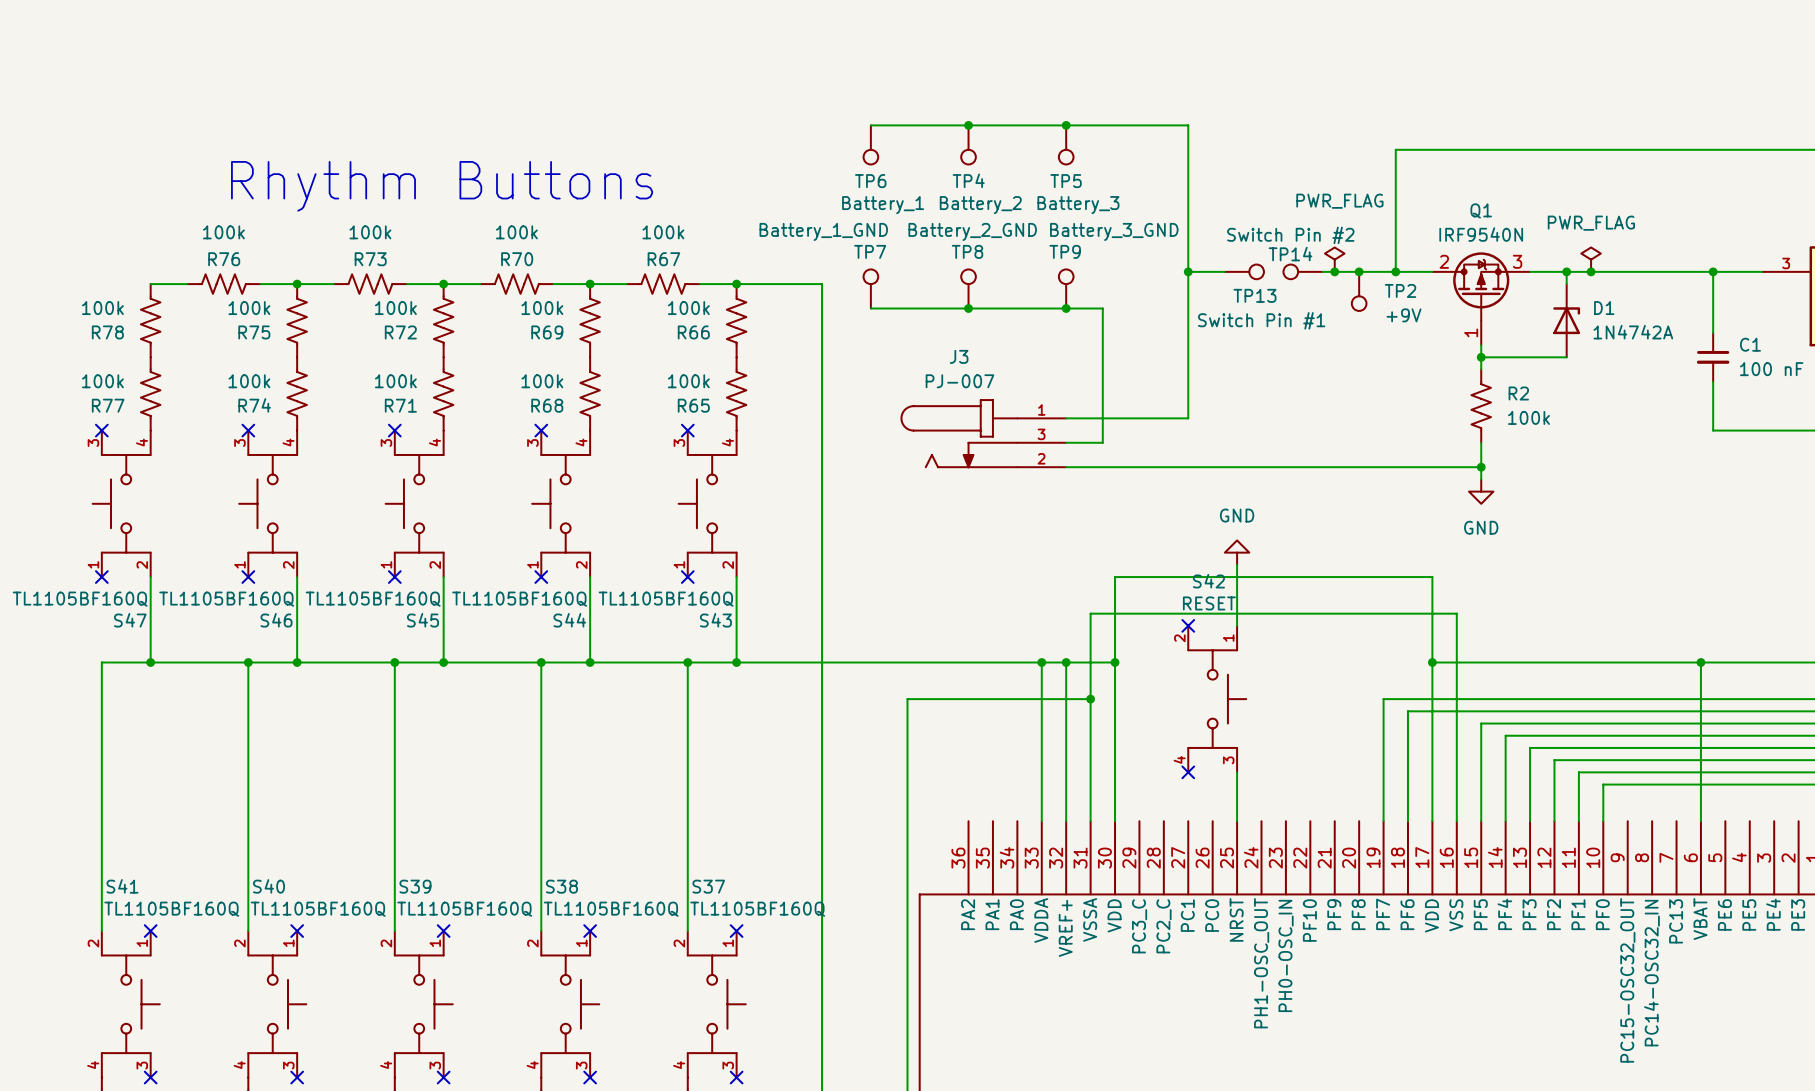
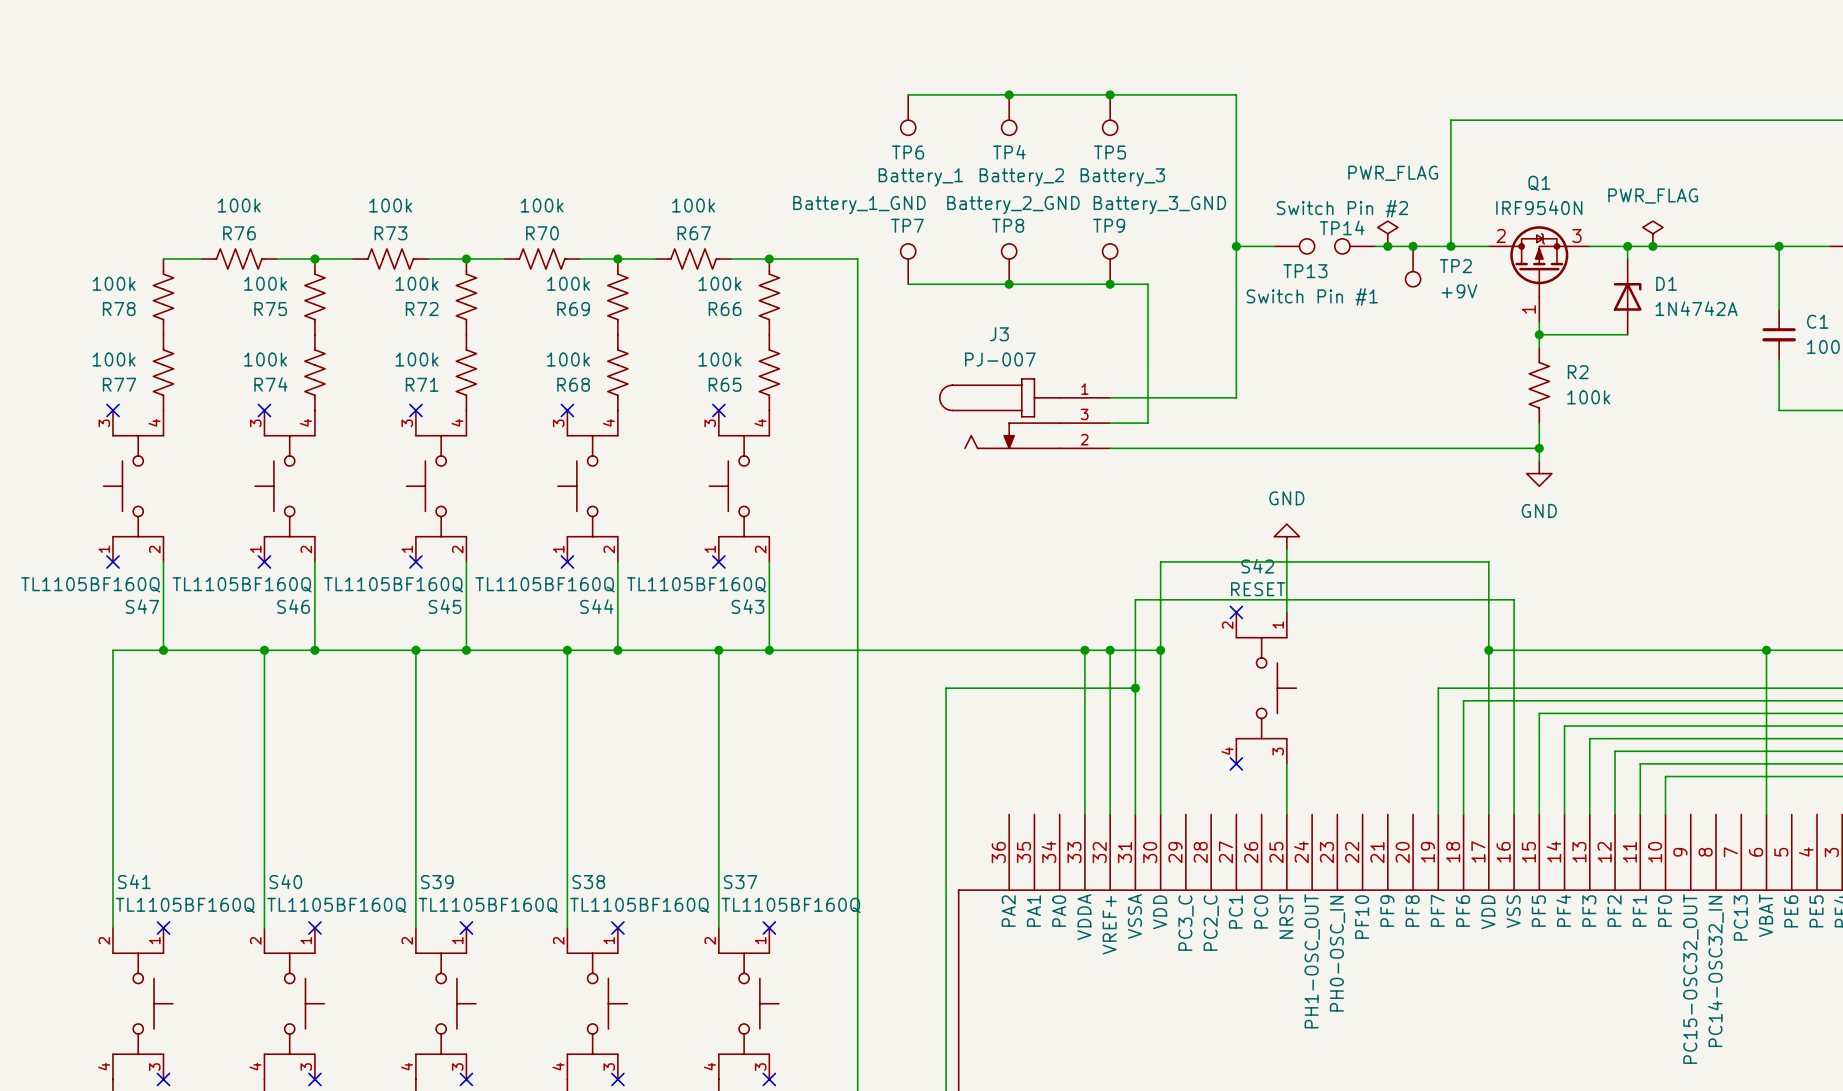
text: Rhythm Buttons (442, 186) -> none

